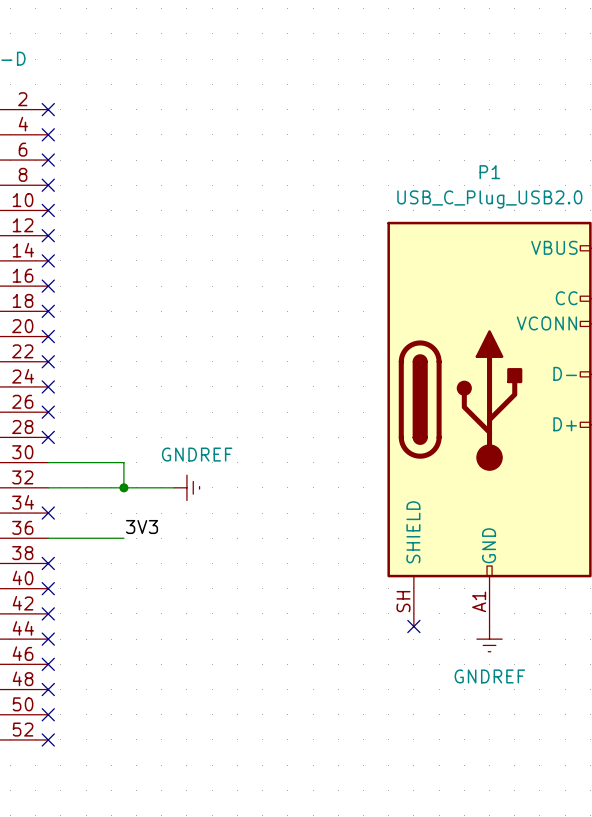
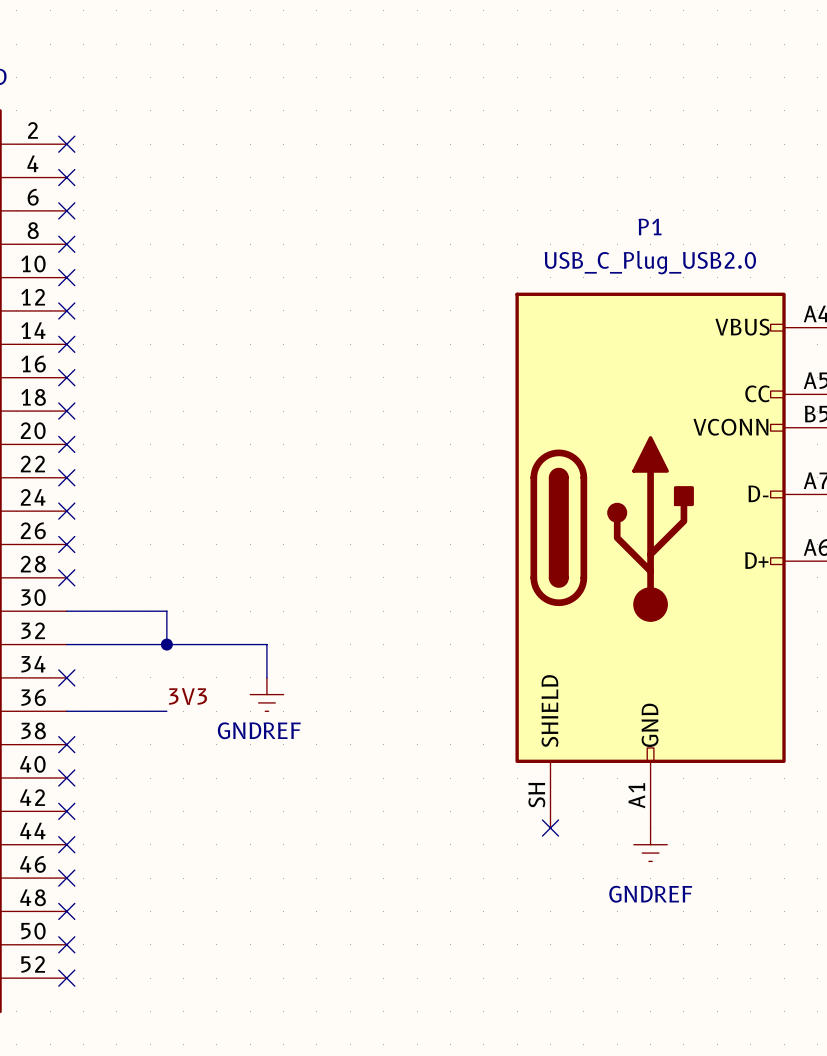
power symbol text position: GNDREF (197, 454) -> GNDREF (259, 730)
wire: none -> (233, 644) (266, 644) (266, 677)
power symbol rotation: 0° (186, 487) -> 90° clockwise (266, 694)
power symbol position: GNDREF (186, 487) -> GNDREF (266, 694)

